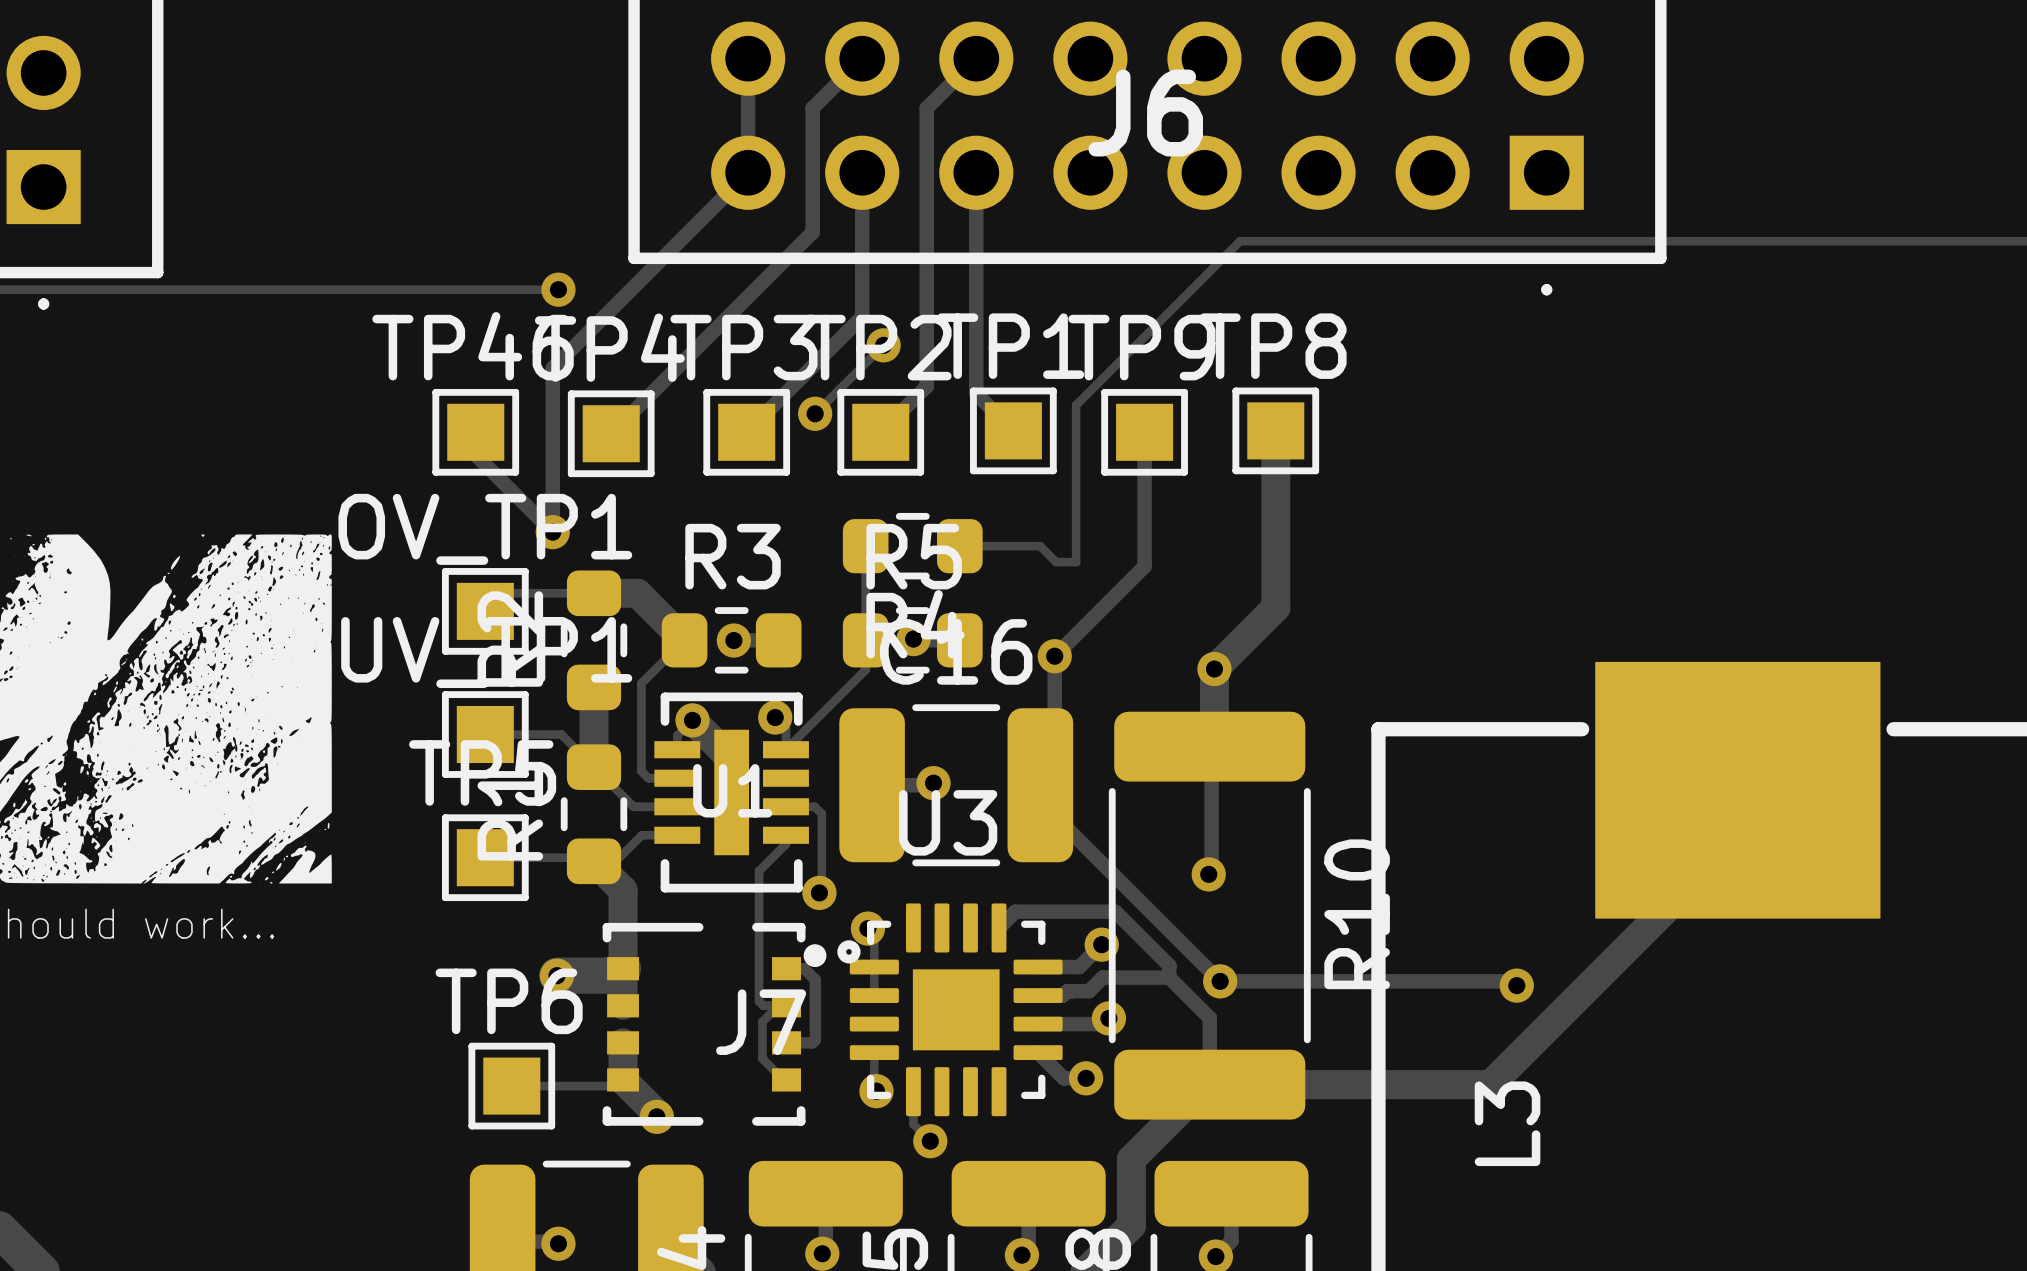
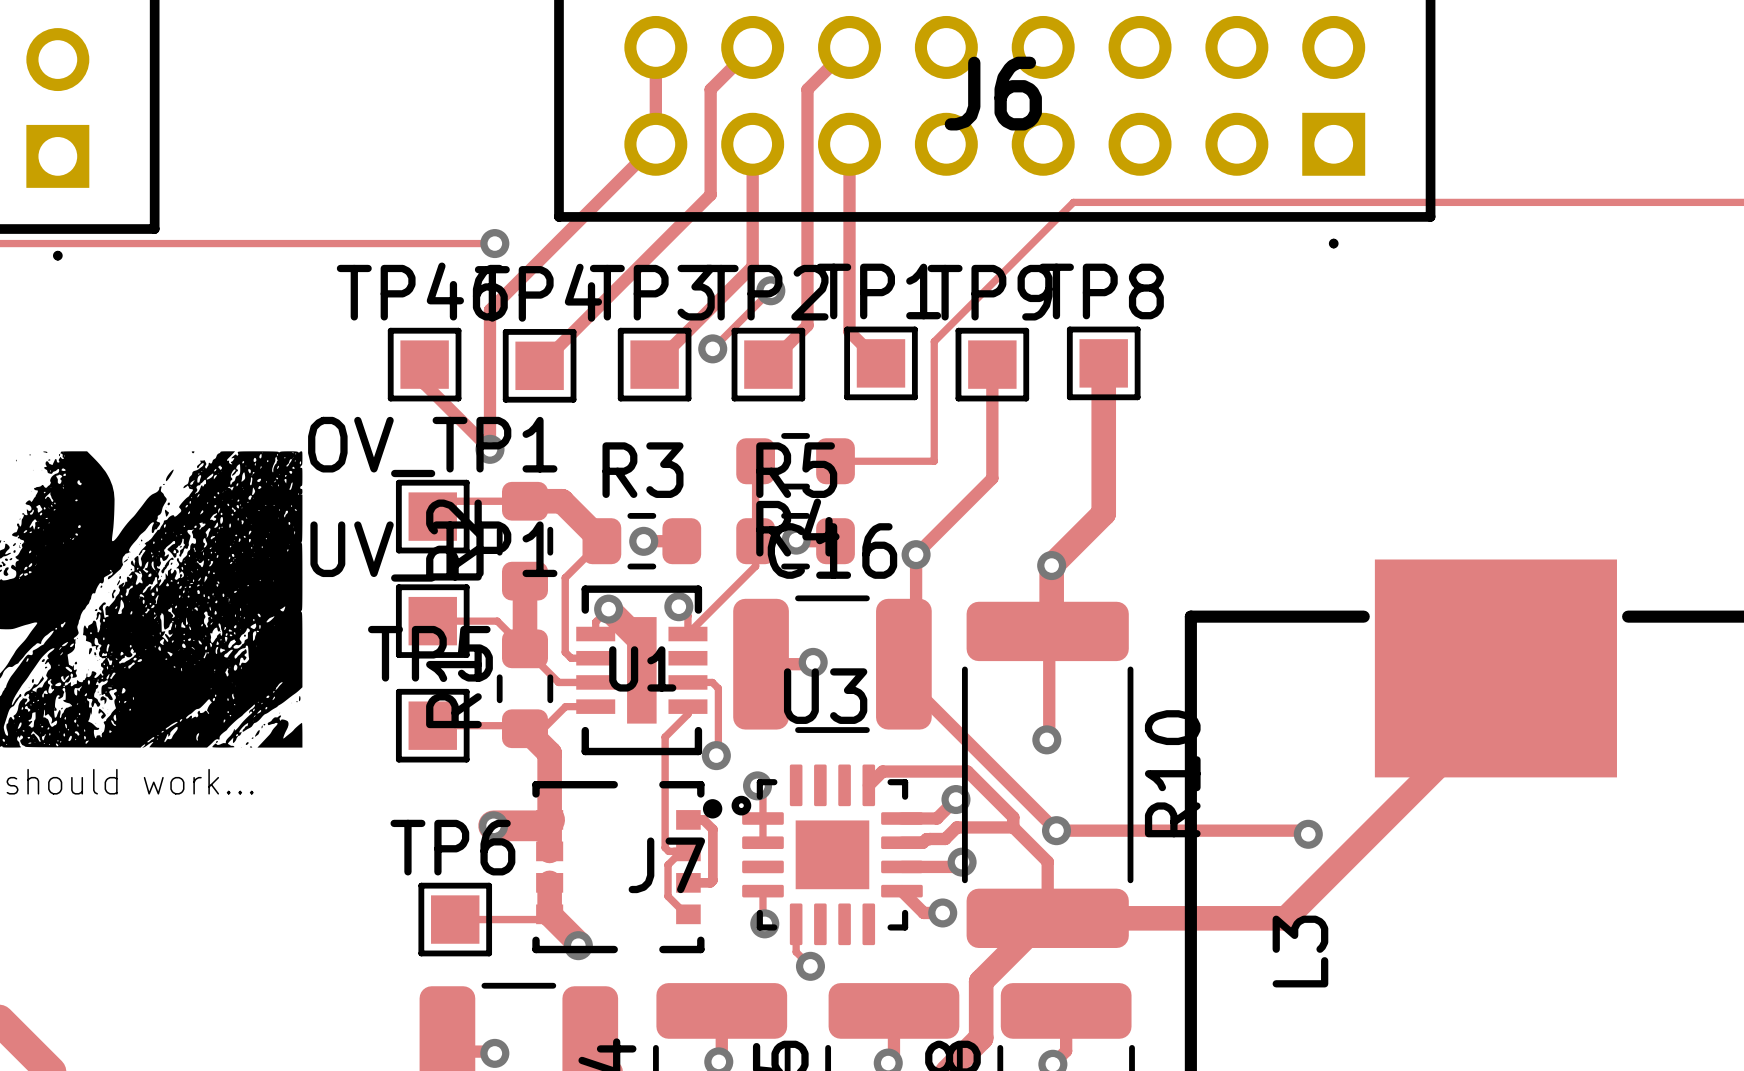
track: (1040, 546) (1056, 562) (1076, 562) (1076, 546) -> (903, 461) (934, 461)

